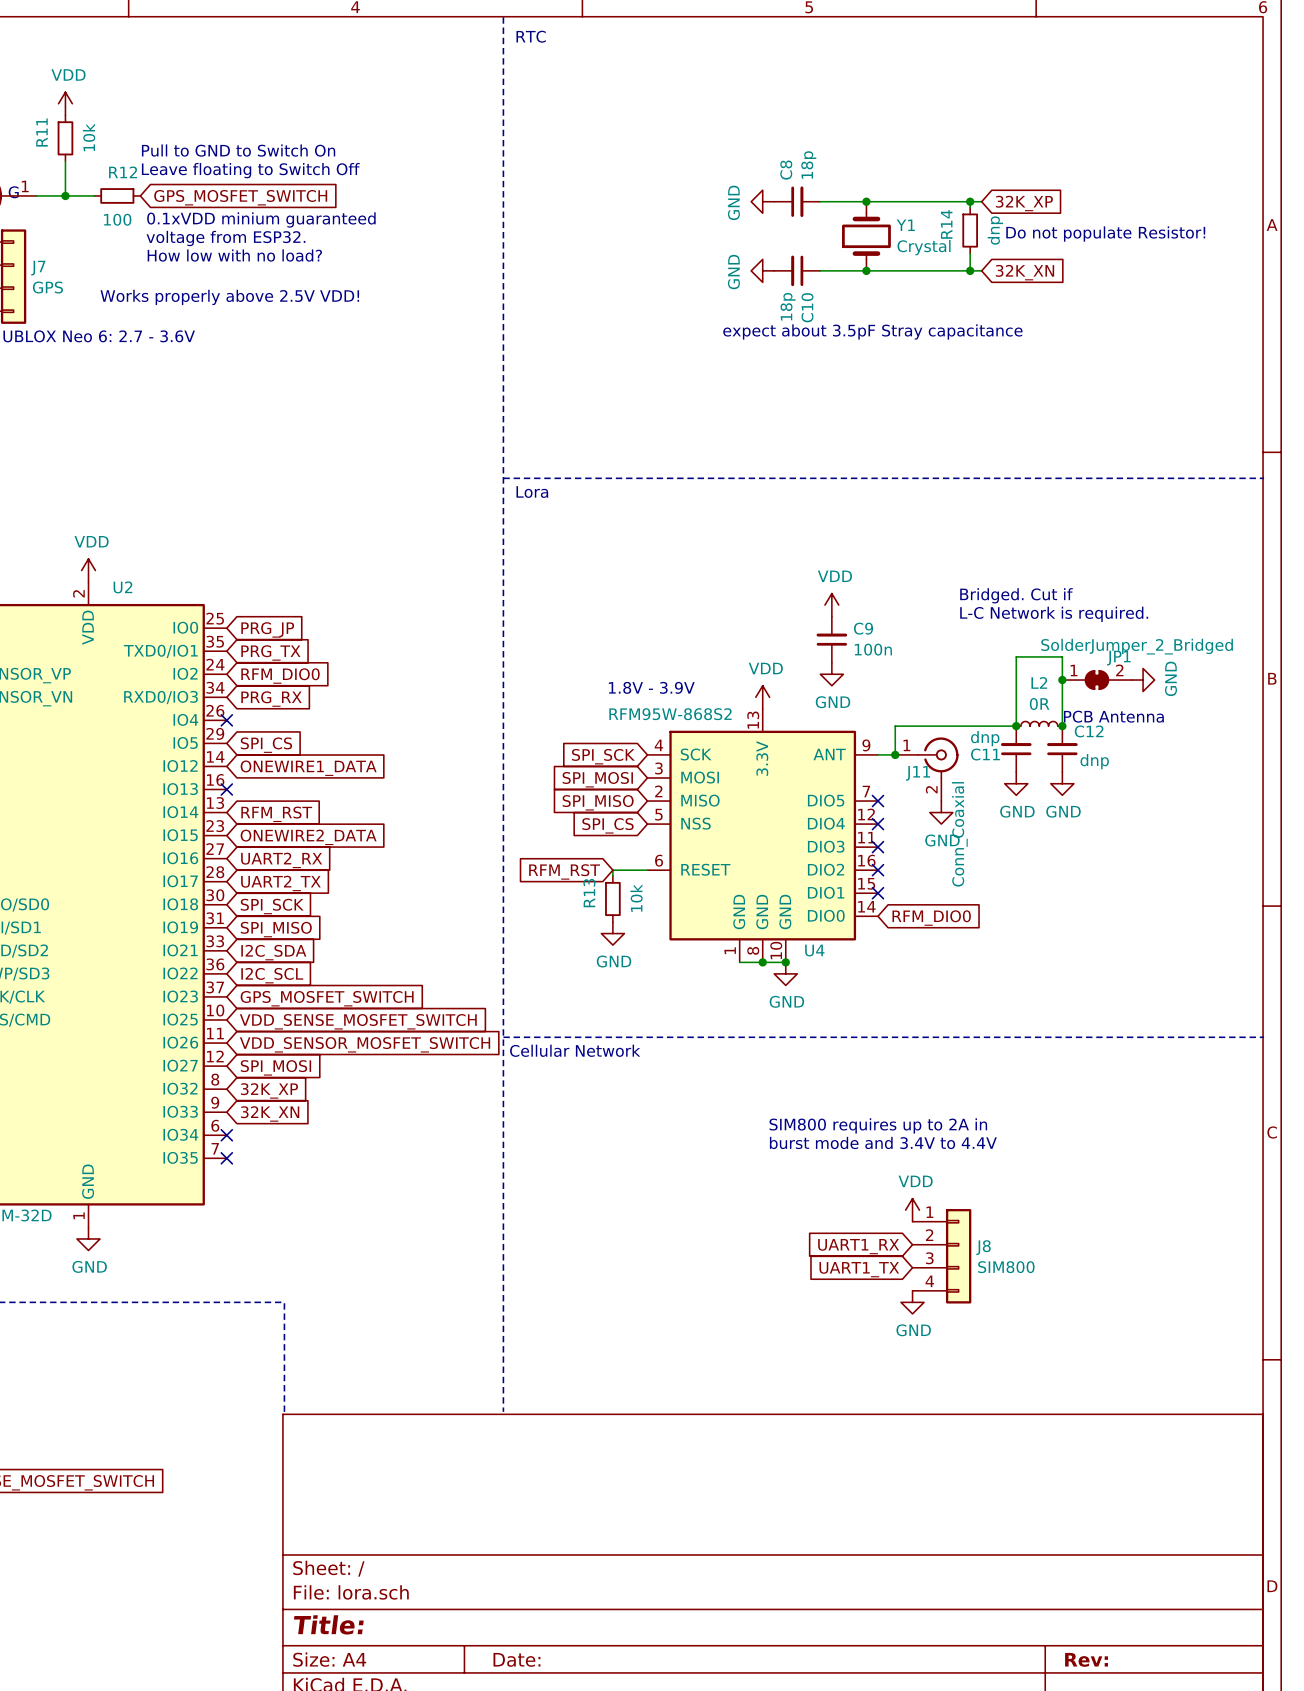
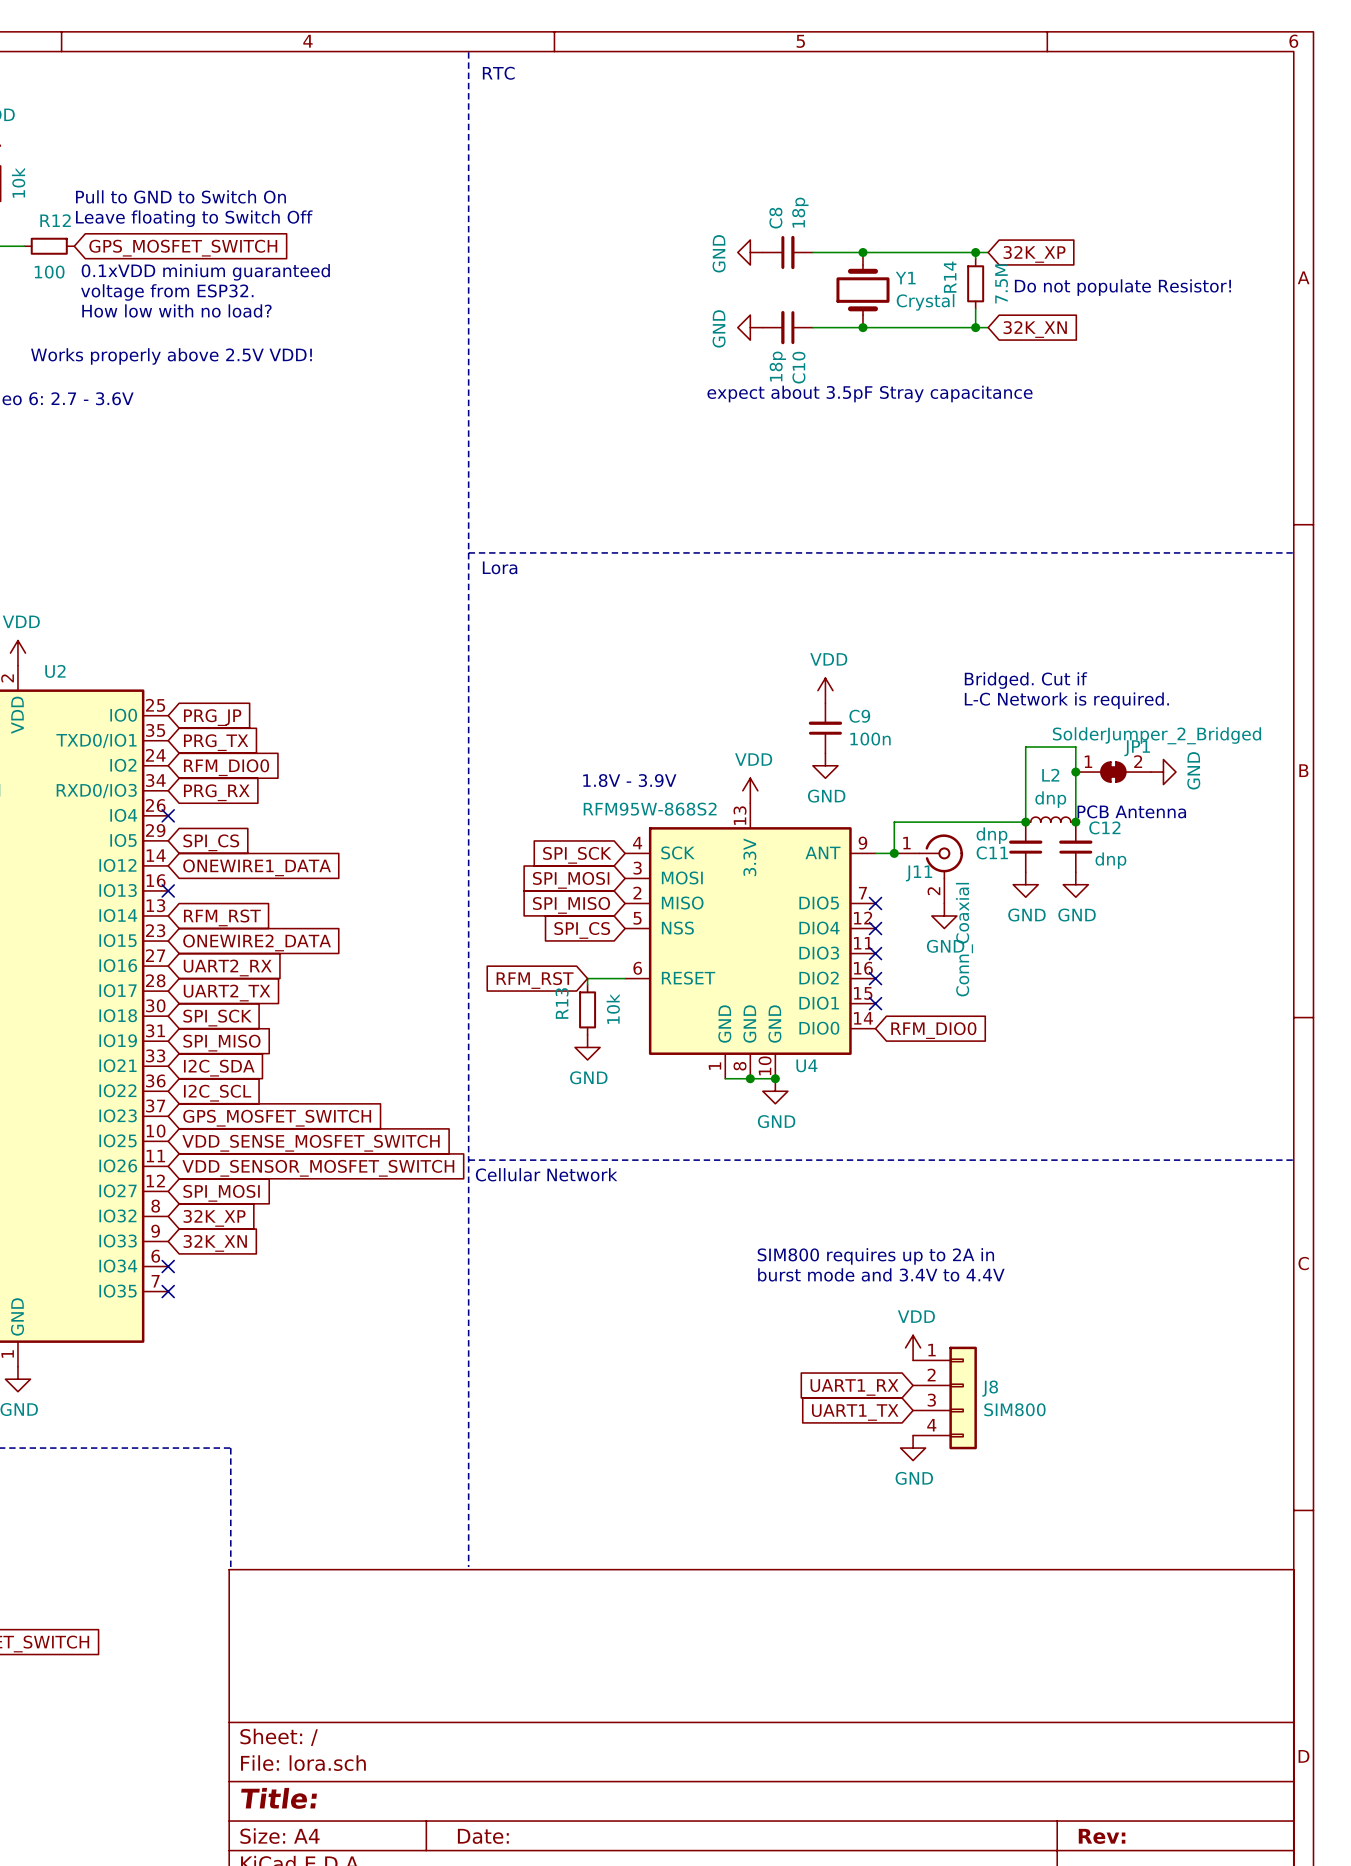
R14 value: dnp (995, 230) -> 7.5M (1001, 283)
L2 value: 0R (1039, 704) -> dnp (1050, 799)

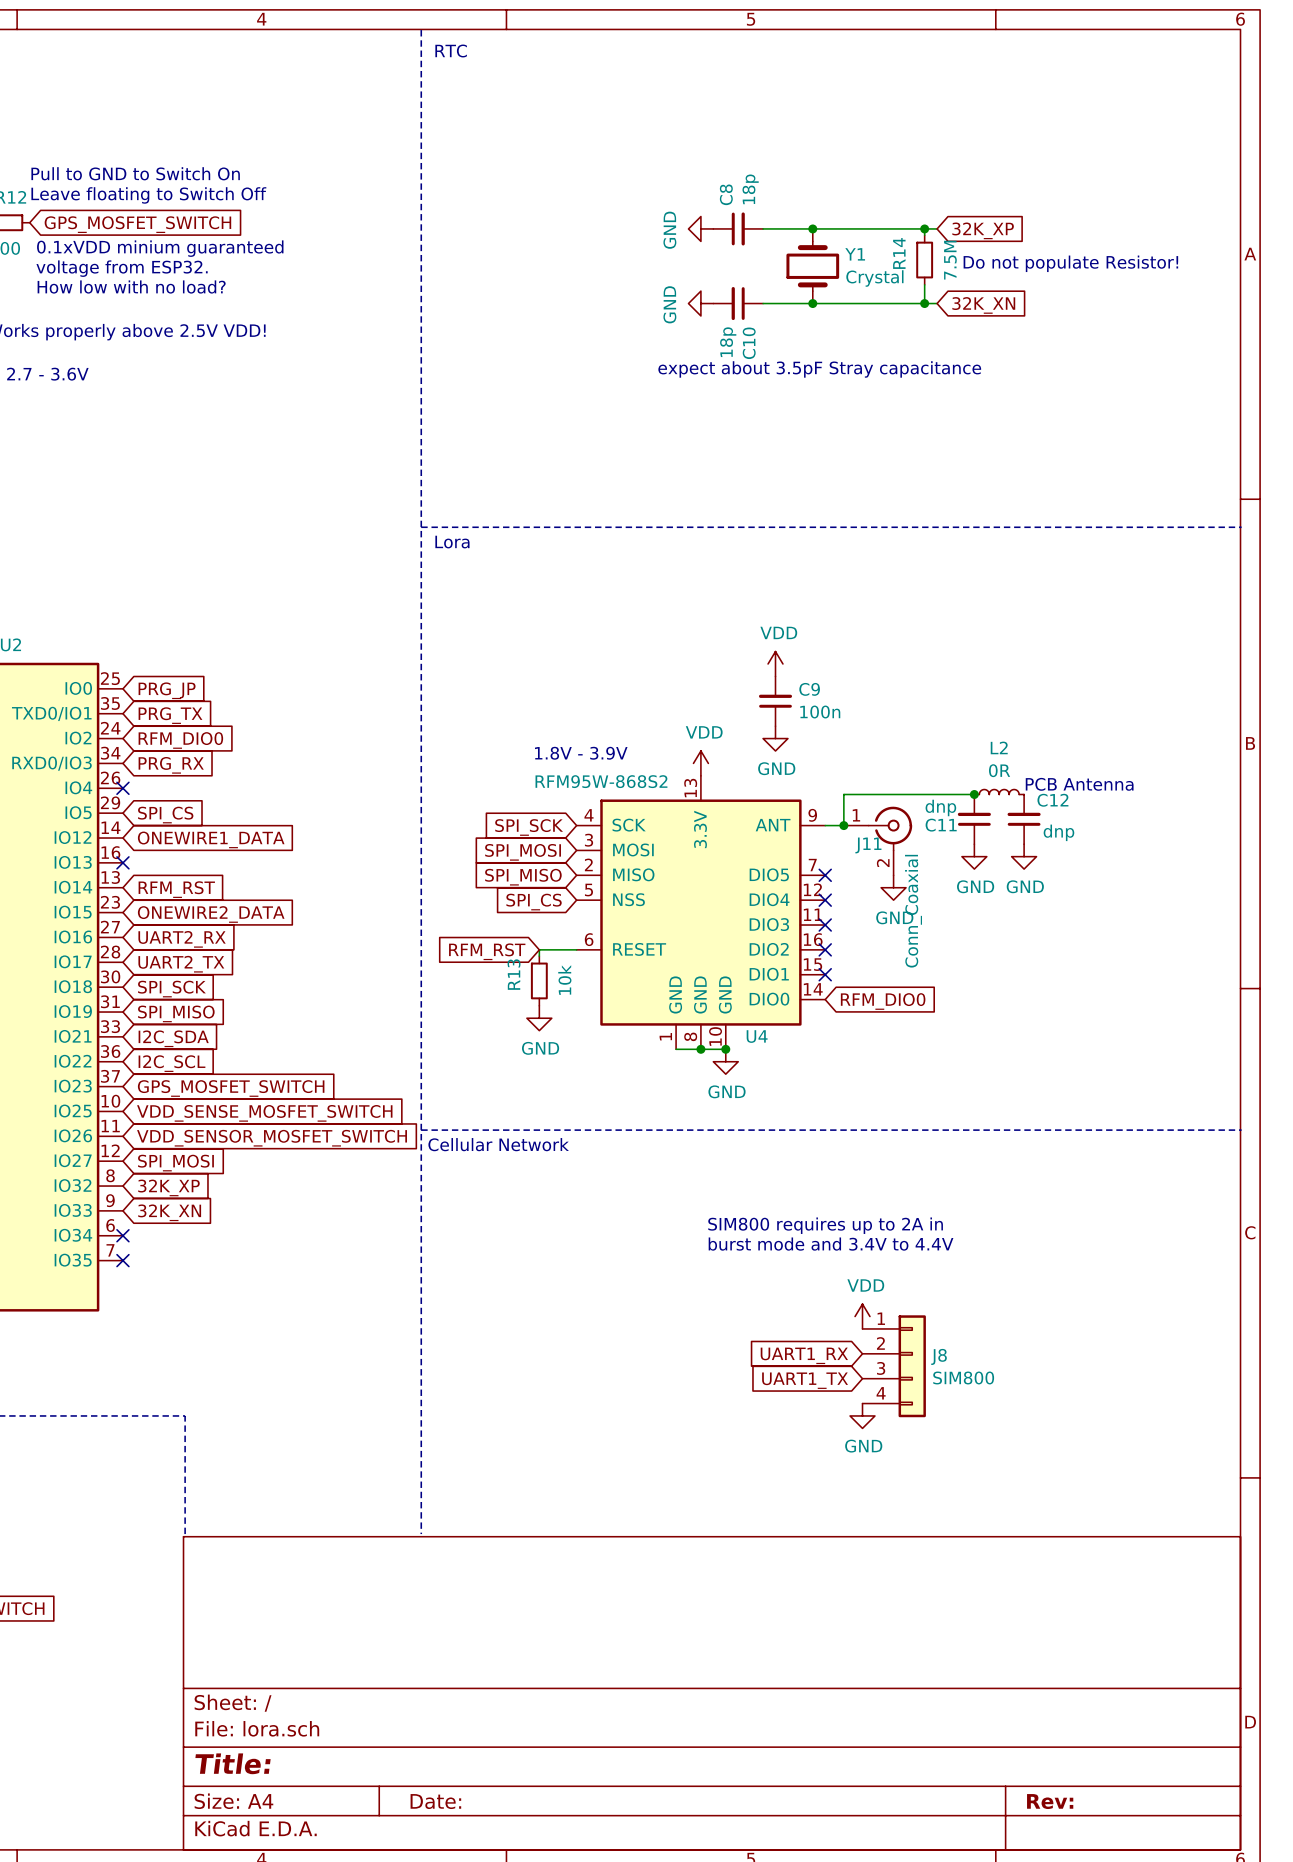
text: Bridged. Cut if (1025, 680) -> none
text: L-C Network is required. (1066, 700) -> none
junction: (1075, 772) -> none
JP1: SolderJumper_2_Bridged (1113, 772) -> none
power symbol: GND (1163, 772) -> none
L2 value: dnp (1050, 799) -> 0R (999, 770)
wire: (1025, 822) (1025, 747) (1075, 747) (1075, 822) -> none
junction: (1075, 822) -> none

